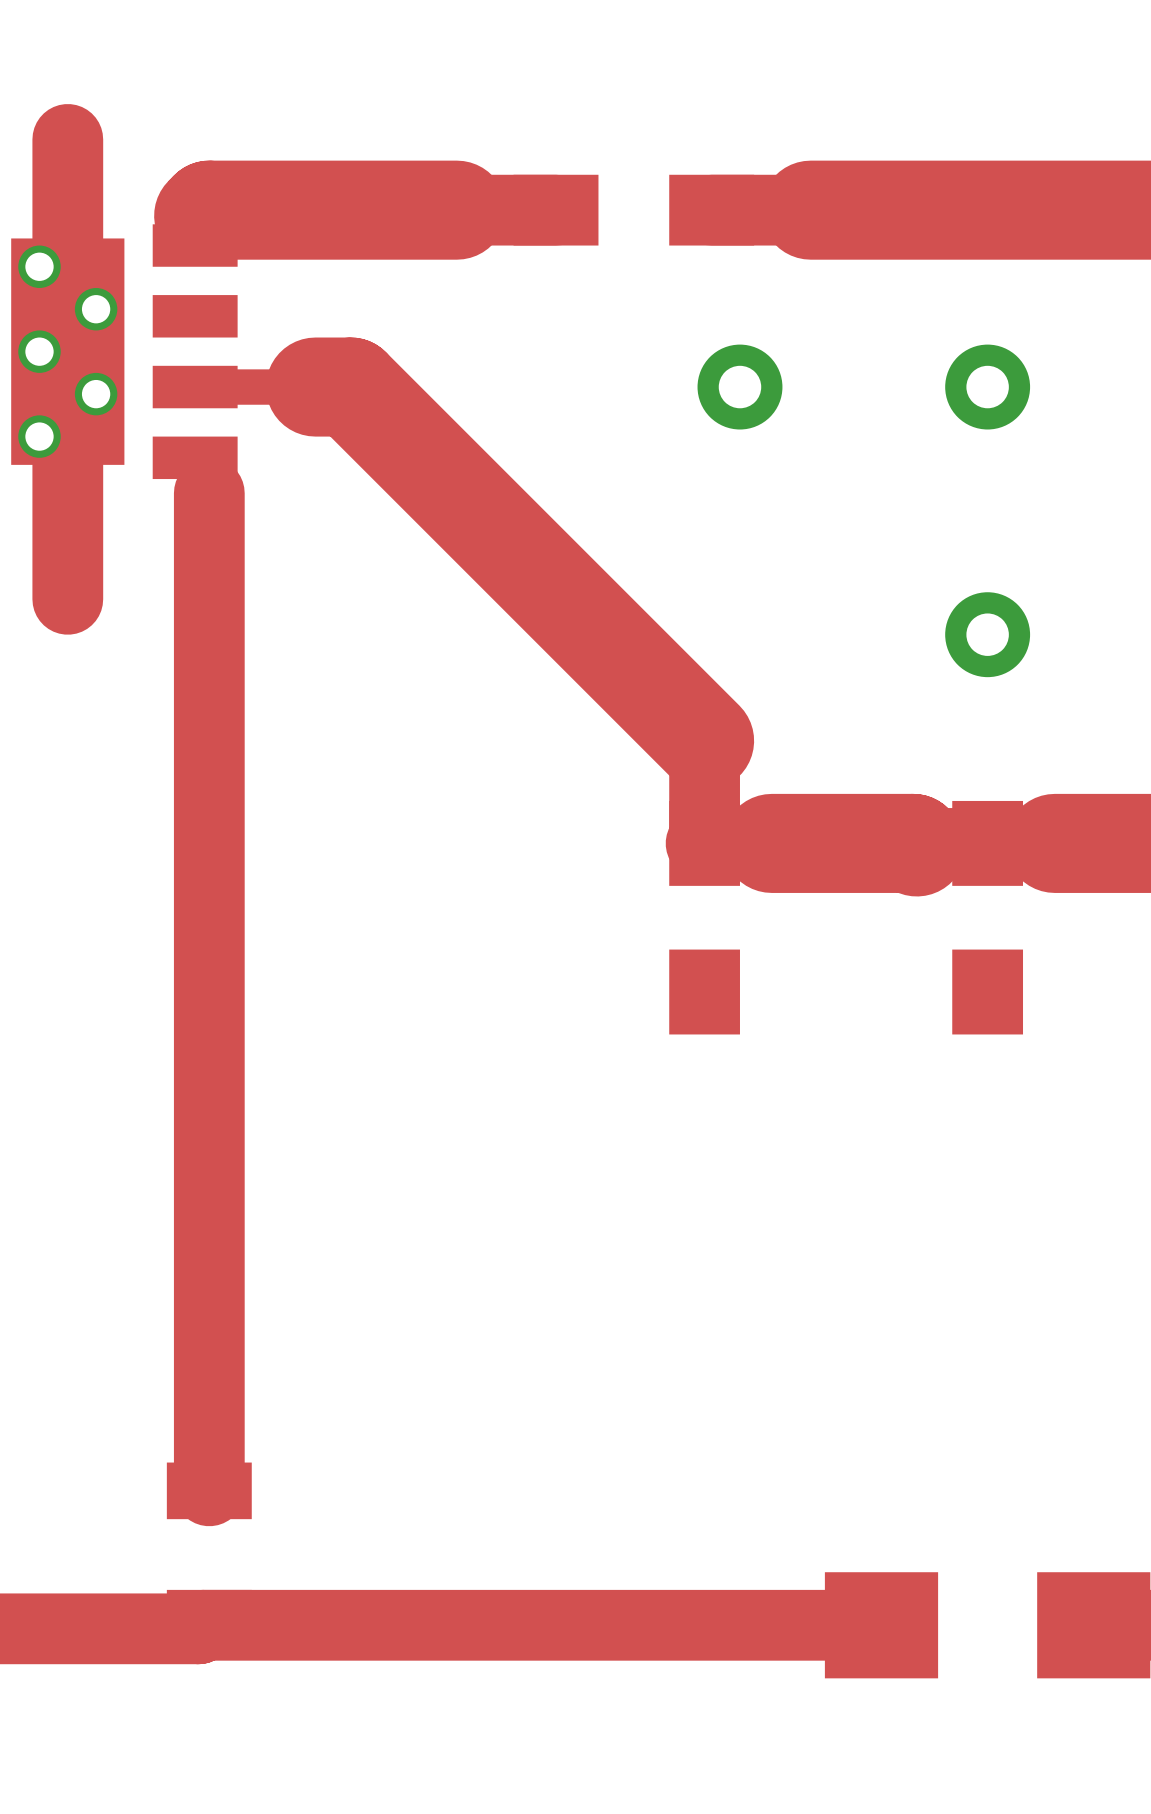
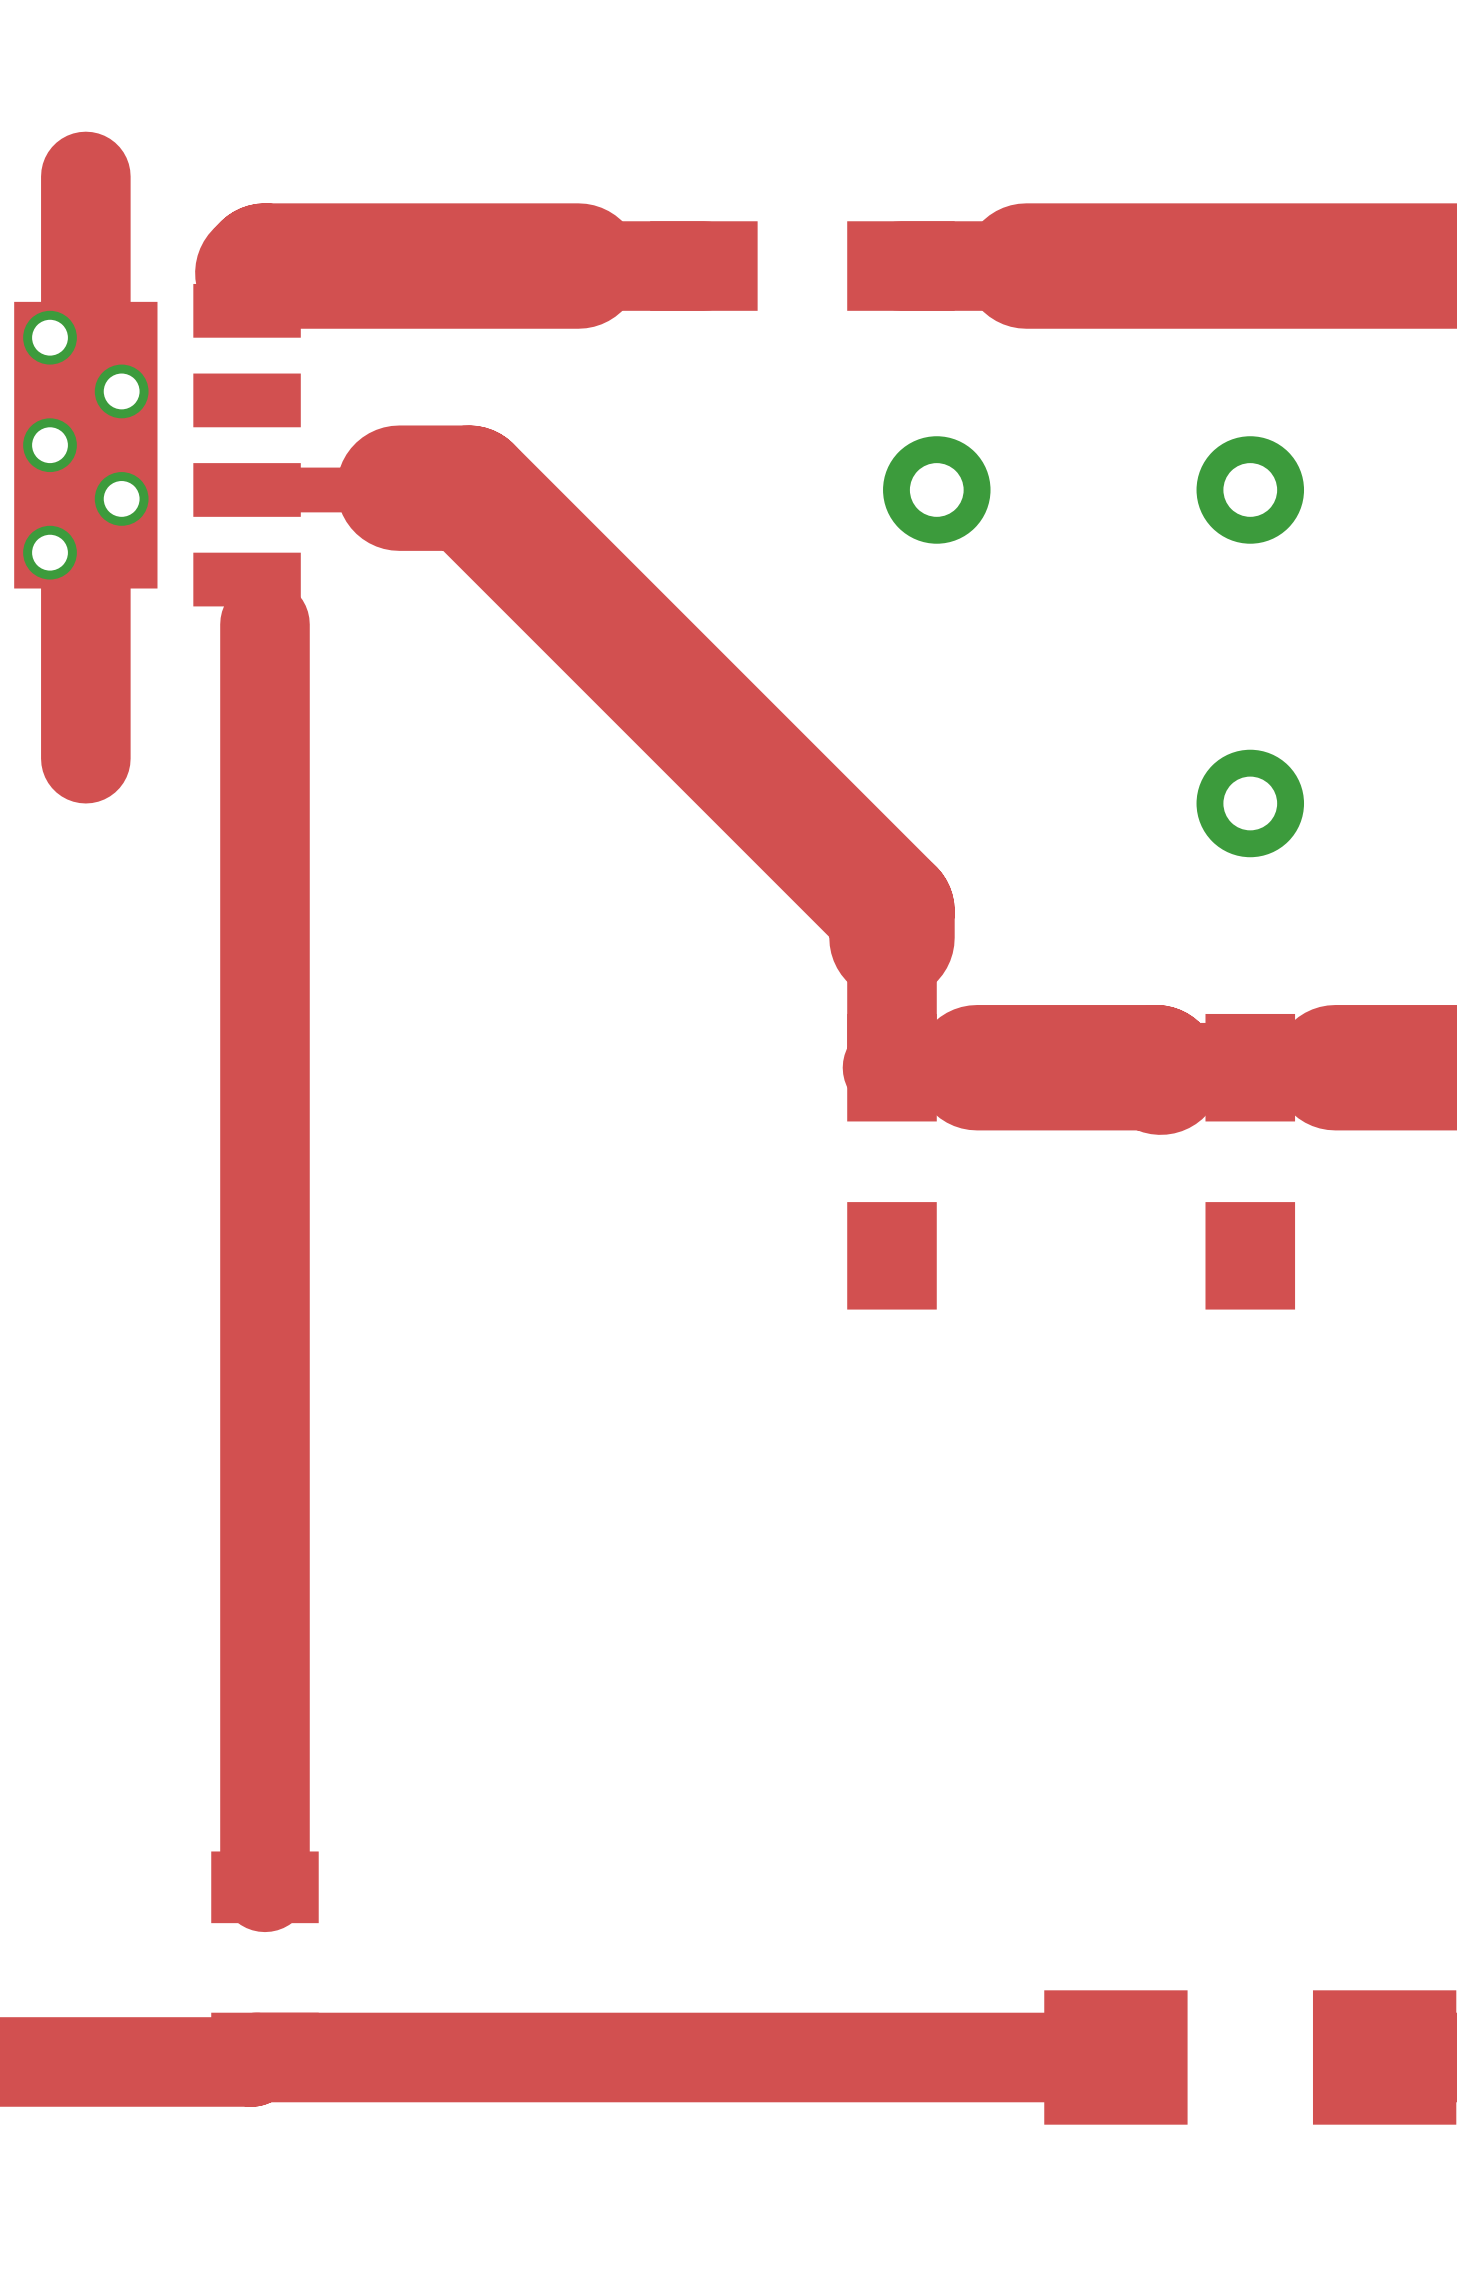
top track: (315, 387) (350, 387) (704, 740) -> (399, 488) (469, 488) (891, 910) (891, 937)

